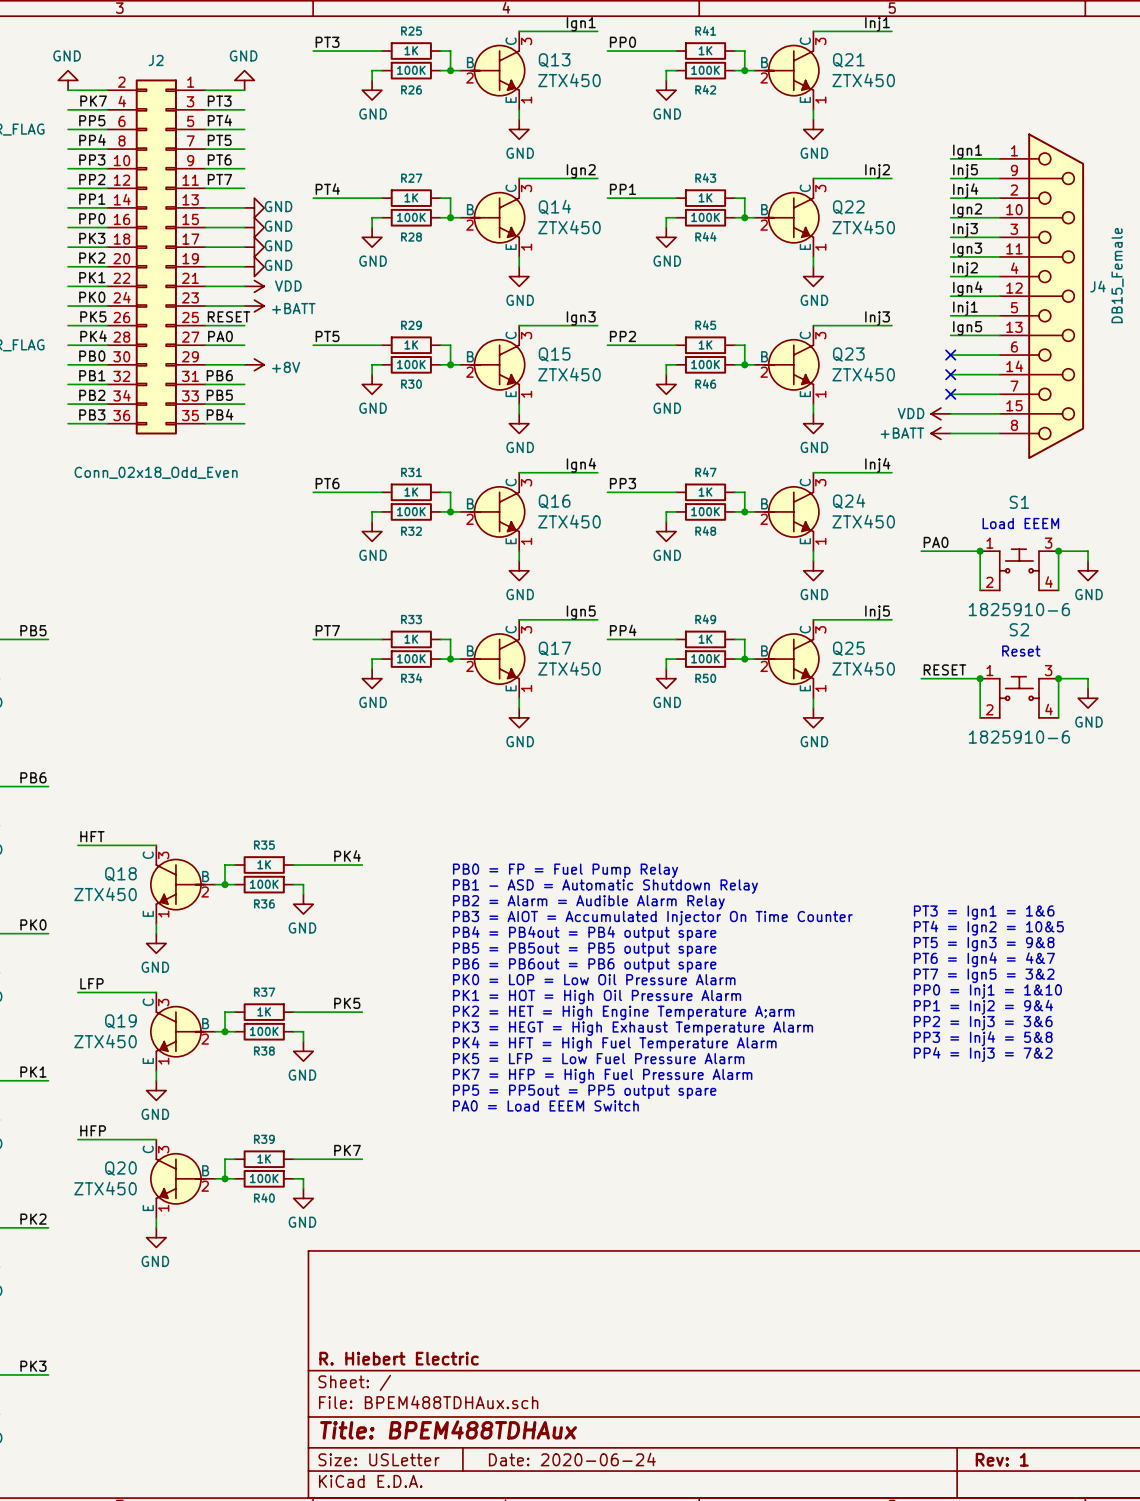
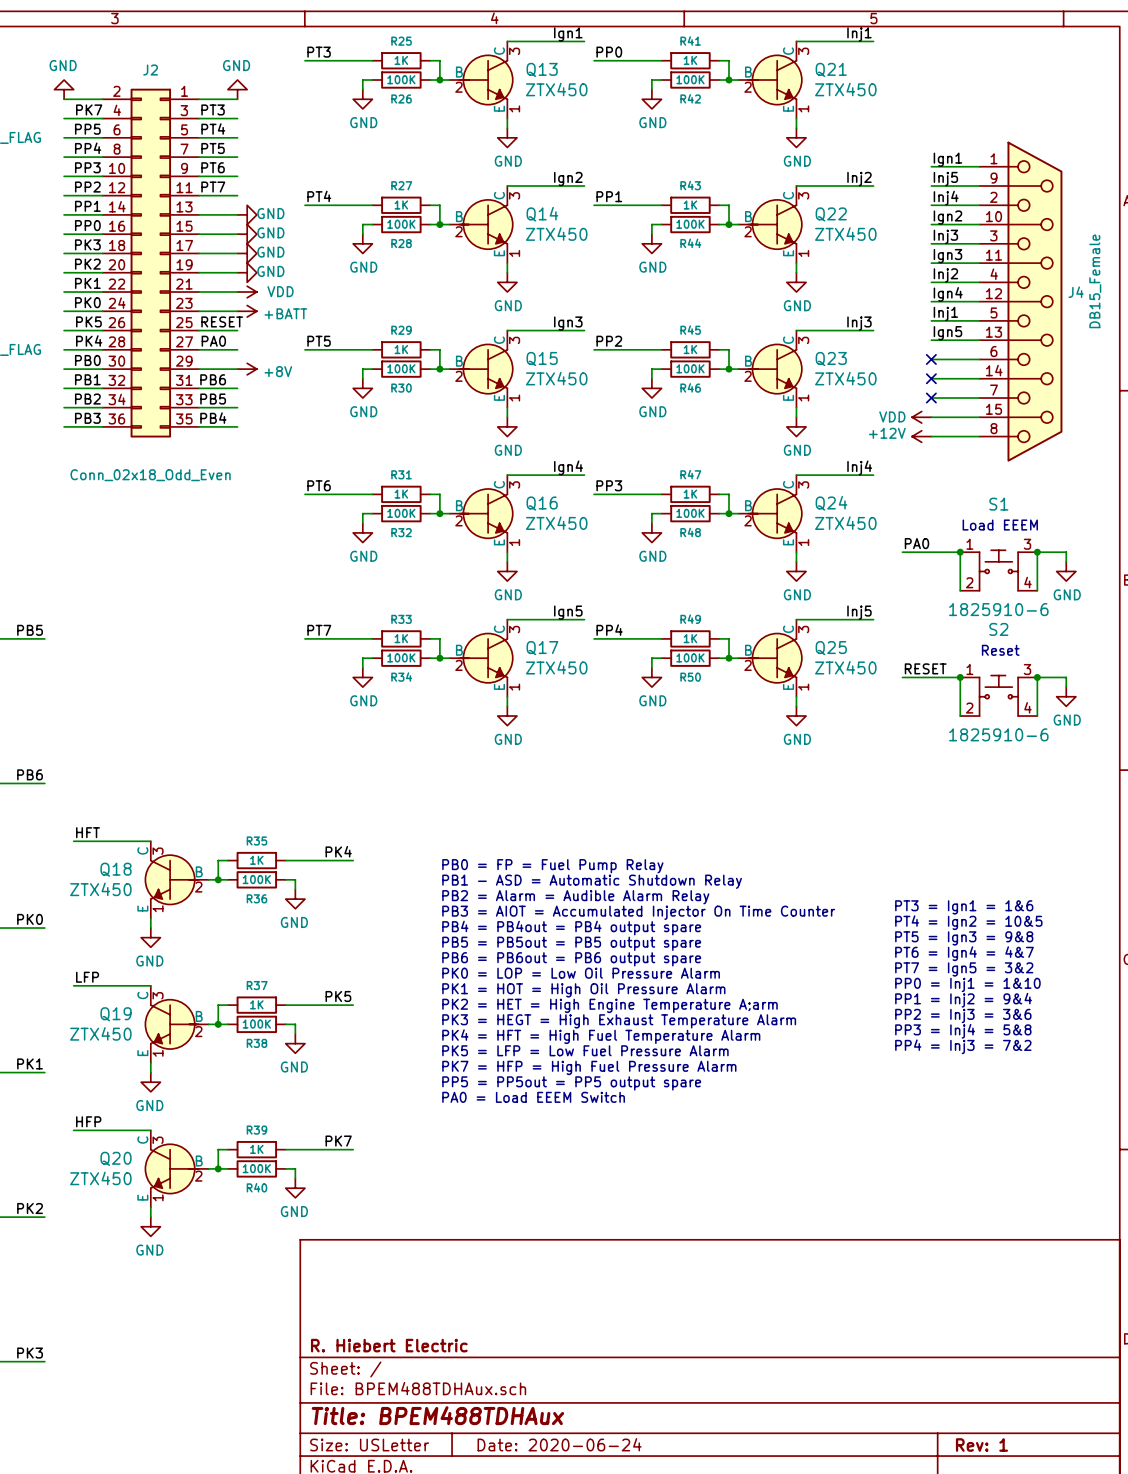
power symbol: +BATT (940, 433) -> +12V (921, 436)

